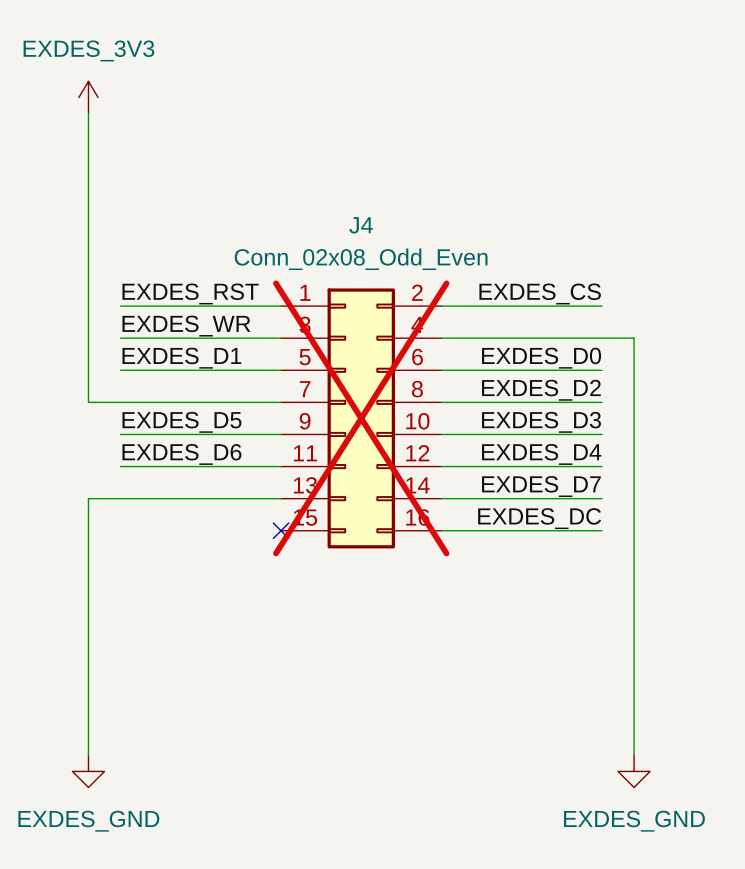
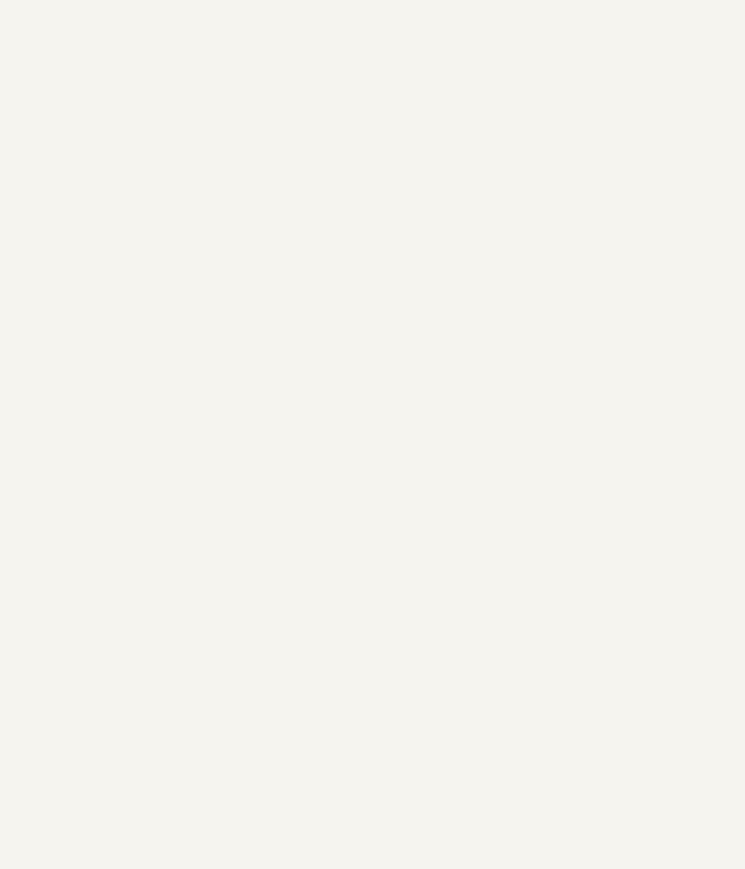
power symbol: EXDES_3V3 (88, 97) -> none
wire: (88, 113) (88, 402) (281, 402) -> none
label: EXDES_RST (190, 293) -> none
label: EXDES_CS (540, 293) -> none
wire: (120, 306) (281, 306) -> none
wire: (441, 306) (601, 306) -> none
label: EXDES_WR (186, 326) -> none
wire: (120, 338) (281, 338) -> none
wire: (441, 338) (634, 338) (634, 755) -> none
label: EXDES_D1 (181, 358) -> none
label: EXDES_D0 (541, 358) -> none
wire: (120, 370) (281, 370) -> none
wire: (441, 370) (601, 370) -> none
label: EXDES_D2 (541, 390) -> none
wire: (441, 402) (601, 402) -> none
J4: Conn_02x08_Odd_Even (361, 418) -> none
label: EXDES_D5 (181, 422) -> none
label: EXDES_D3 (541, 422) -> none
wire: (120, 434) (281, 434) -> none
wire: (441, 434) (601, 434) -> none
label: EXDES_D6 (181, 454) -> none
label: EXDES_D4 (541, 454) -> none
wire: (120, 466) (281, 466) -> none
wire: (441, 466) (601, 466) -> none
label: EXDES_D7 (541, 486) -> none
wire: (281, 498) (88, 498) (88, 755) -> none
wire: (441, 498) (601, 498) -> none
label: EXDES_DC (539, 518) -> none
no-connect mark: (281, 530) -> none
wire: (441, 530) (601, 530) -> none
power symbol: EXDES_GND (88, 771) -> none
power symbol: EXDES_GND (634, 771) -> none

